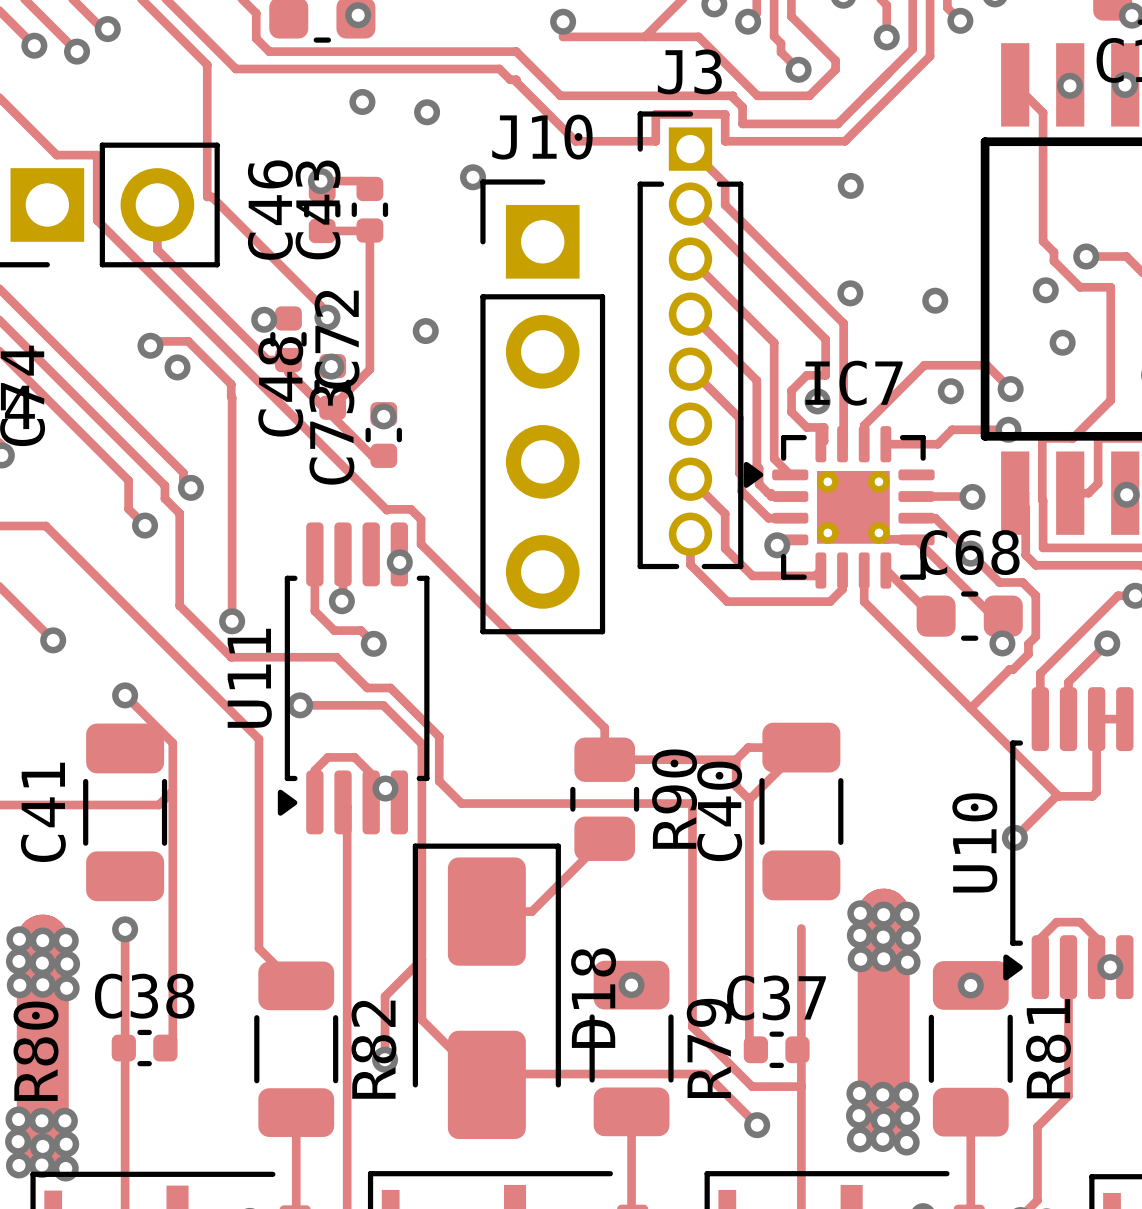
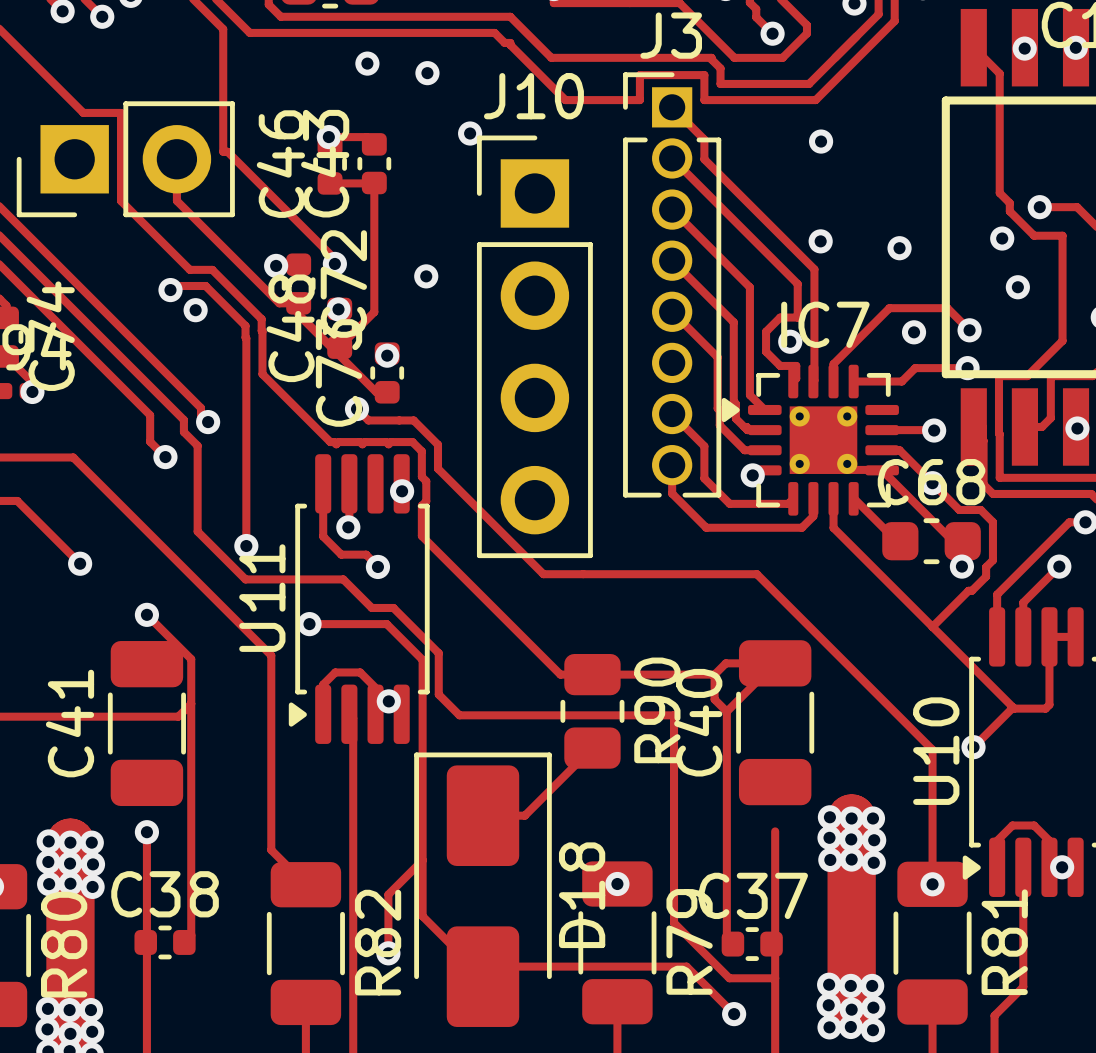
track: (97, 220) (386, 510) -> (121, 173) (121, 200) (189, 269) (212, 269) (261, 319) (262, 374) (330, 442) (336, 444) (338, 442) (360, 442) (362, 444) (364, 442) (386, 442) (388, 444) (390, 442)
track: none -> (357, 409) (368, 420) (413, 420) (437, 444) (437, 468) (543, 574) (756, 574) (932, 749) (932, 884)
via: none -> (357, 409)
track: (421, 544) (604, 727) (604, 759) -> (421, 474) (426, 481) (426, 501) (421, 505) (421, 536) (560, 674) (592, 674)

